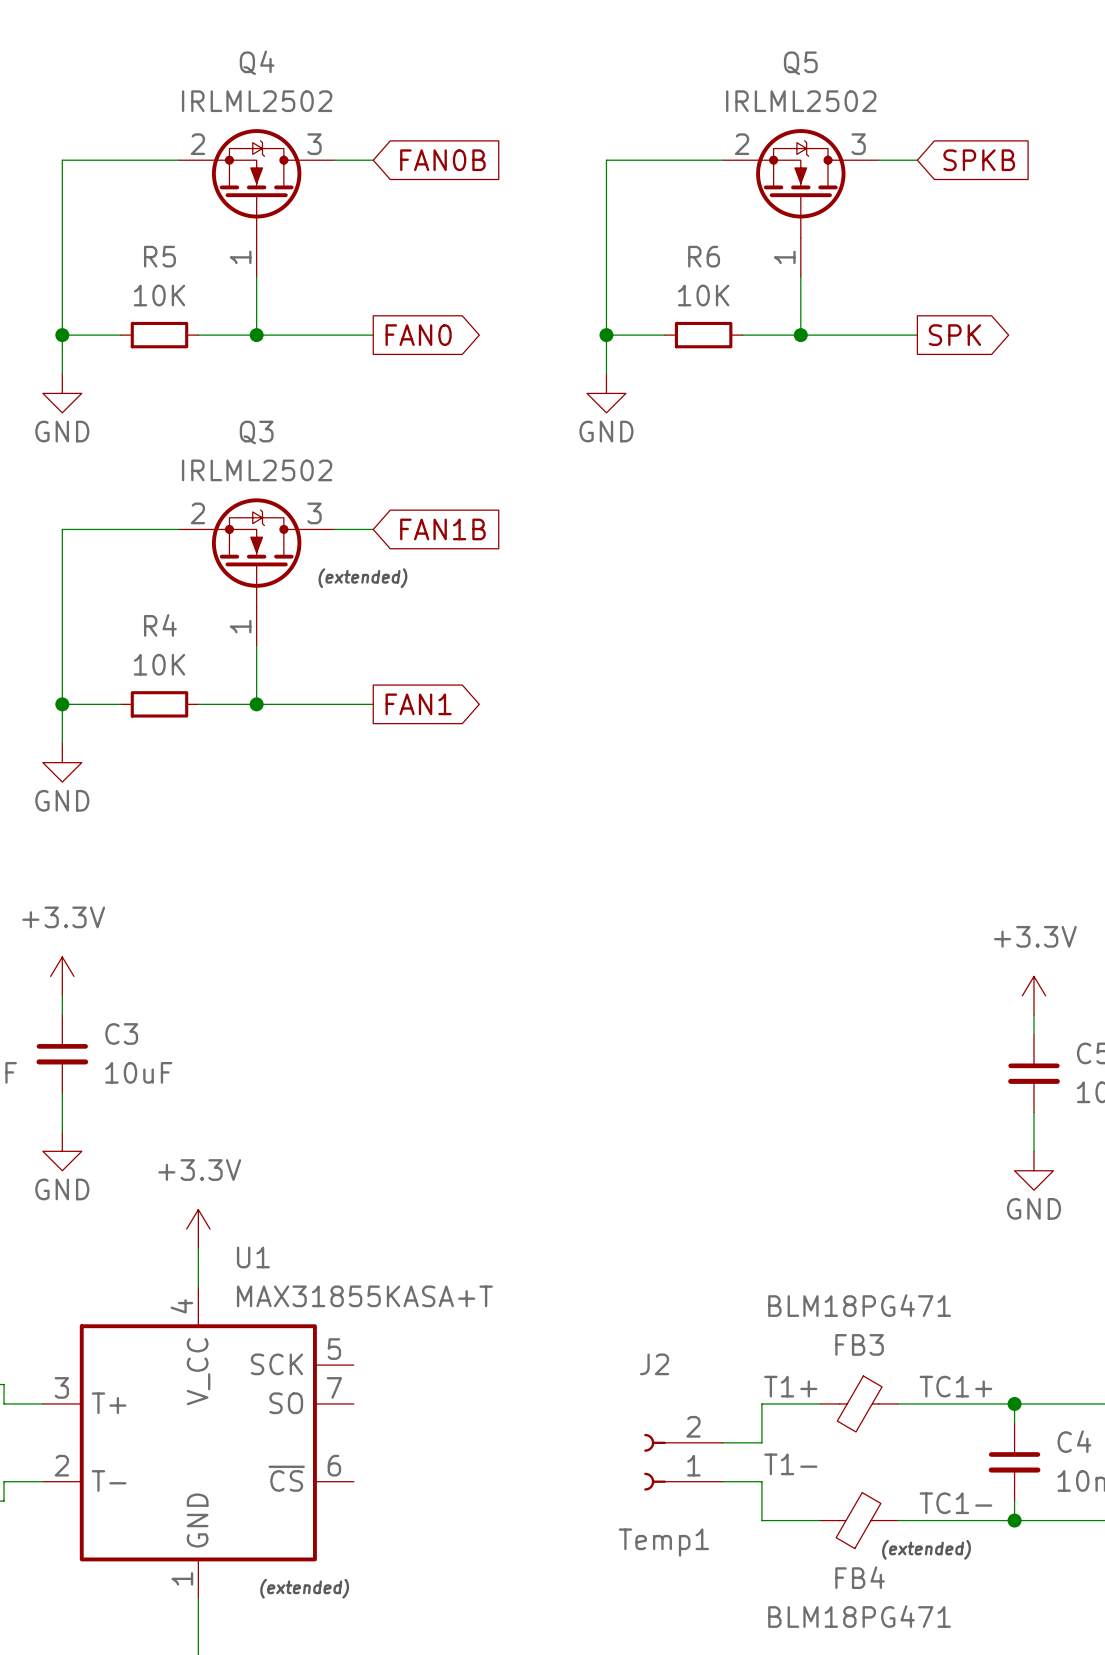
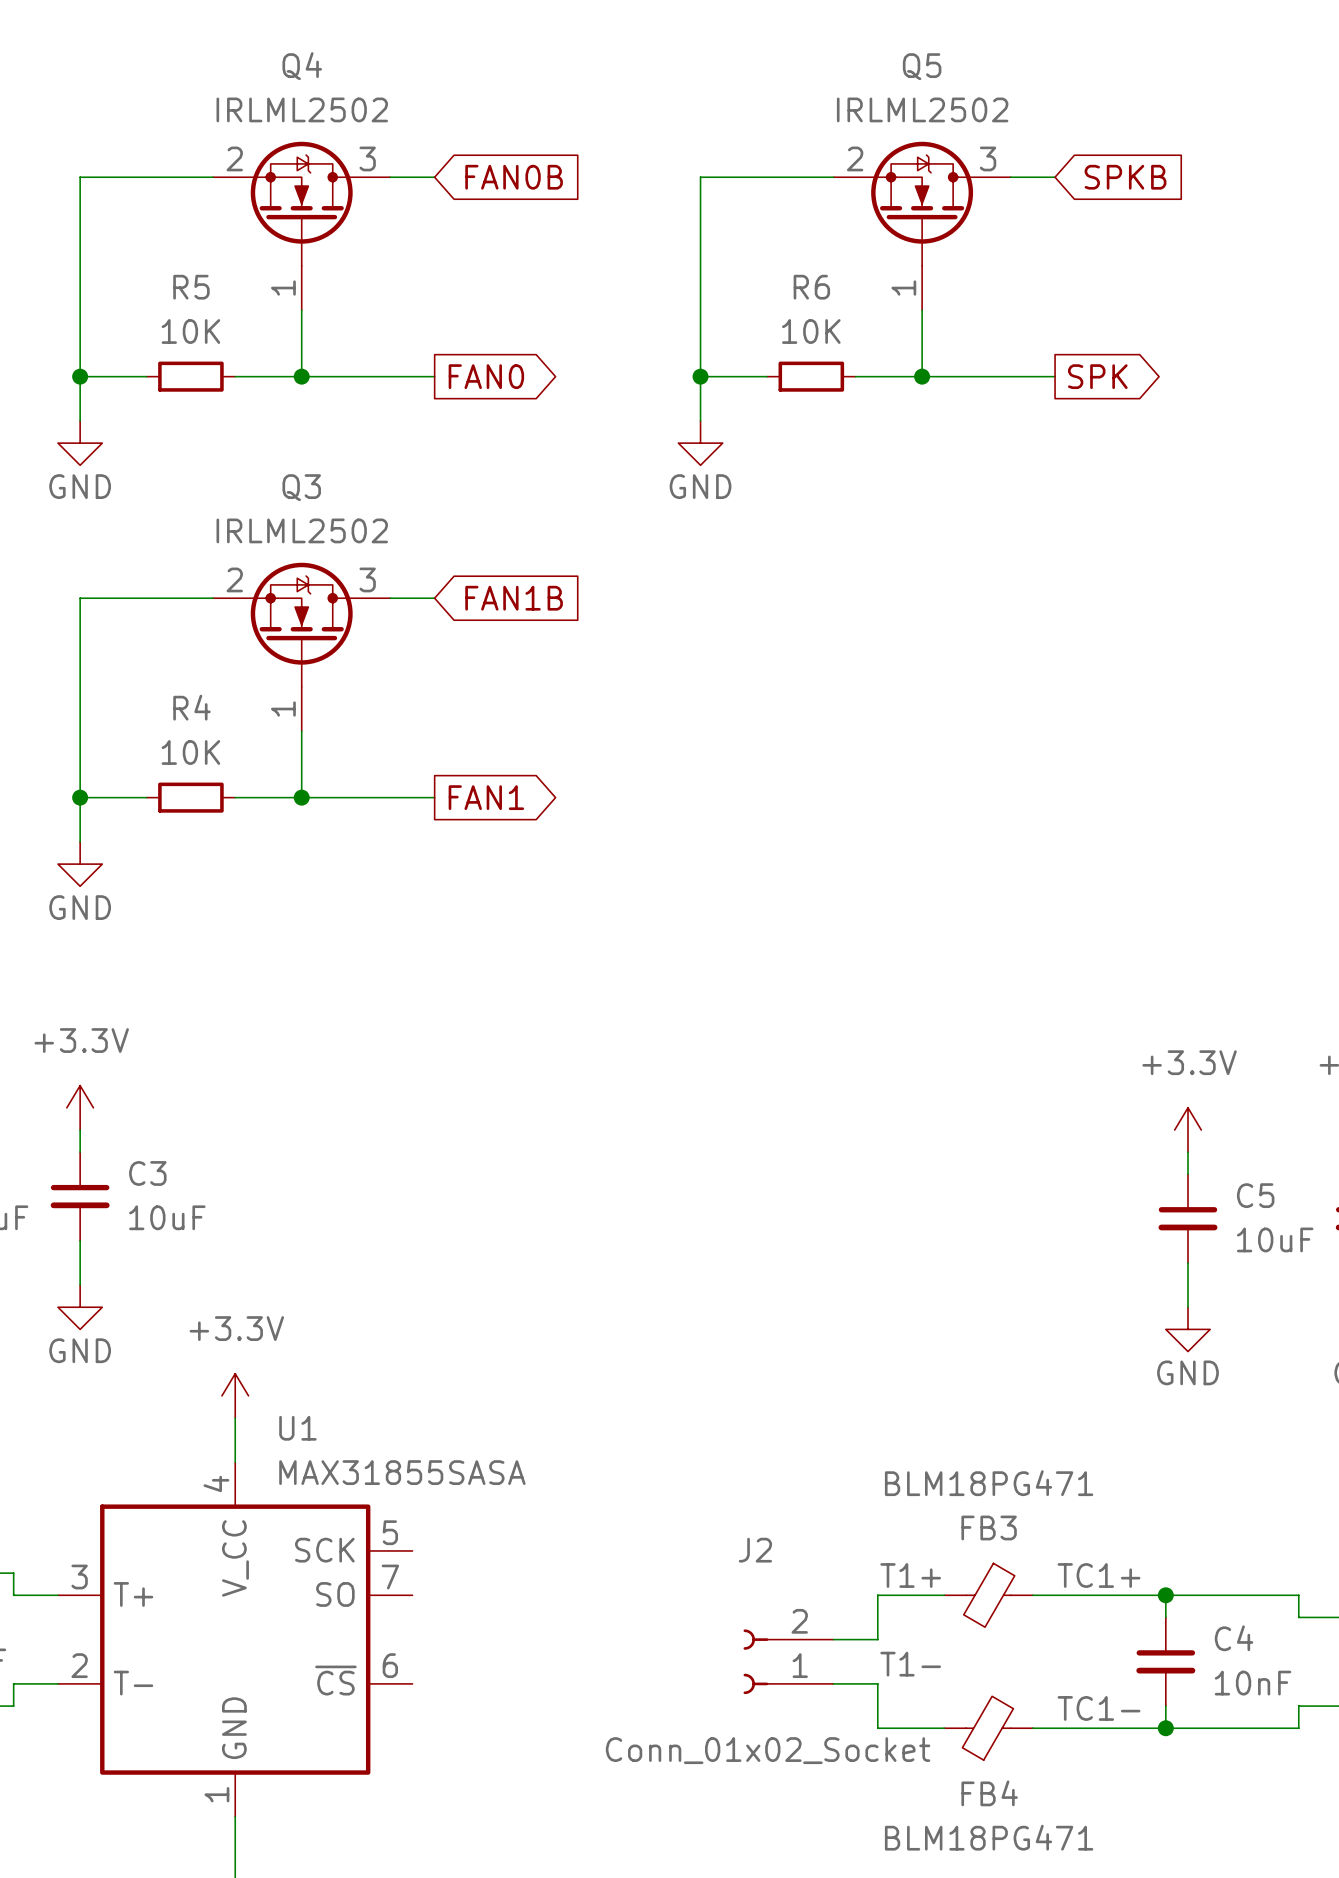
text: (extended) (362, 578) -> none
U1 value: MAX31855KASA+T (364, 1296) -> MAX31855SASA (402, 1472)
J2 value: Temp1 (663, 1542) -> Conn_01x02_Socket (768, 1750)
text: (extended) (926, 1549) -> none
text: (extended) (304, 1588) -> none

